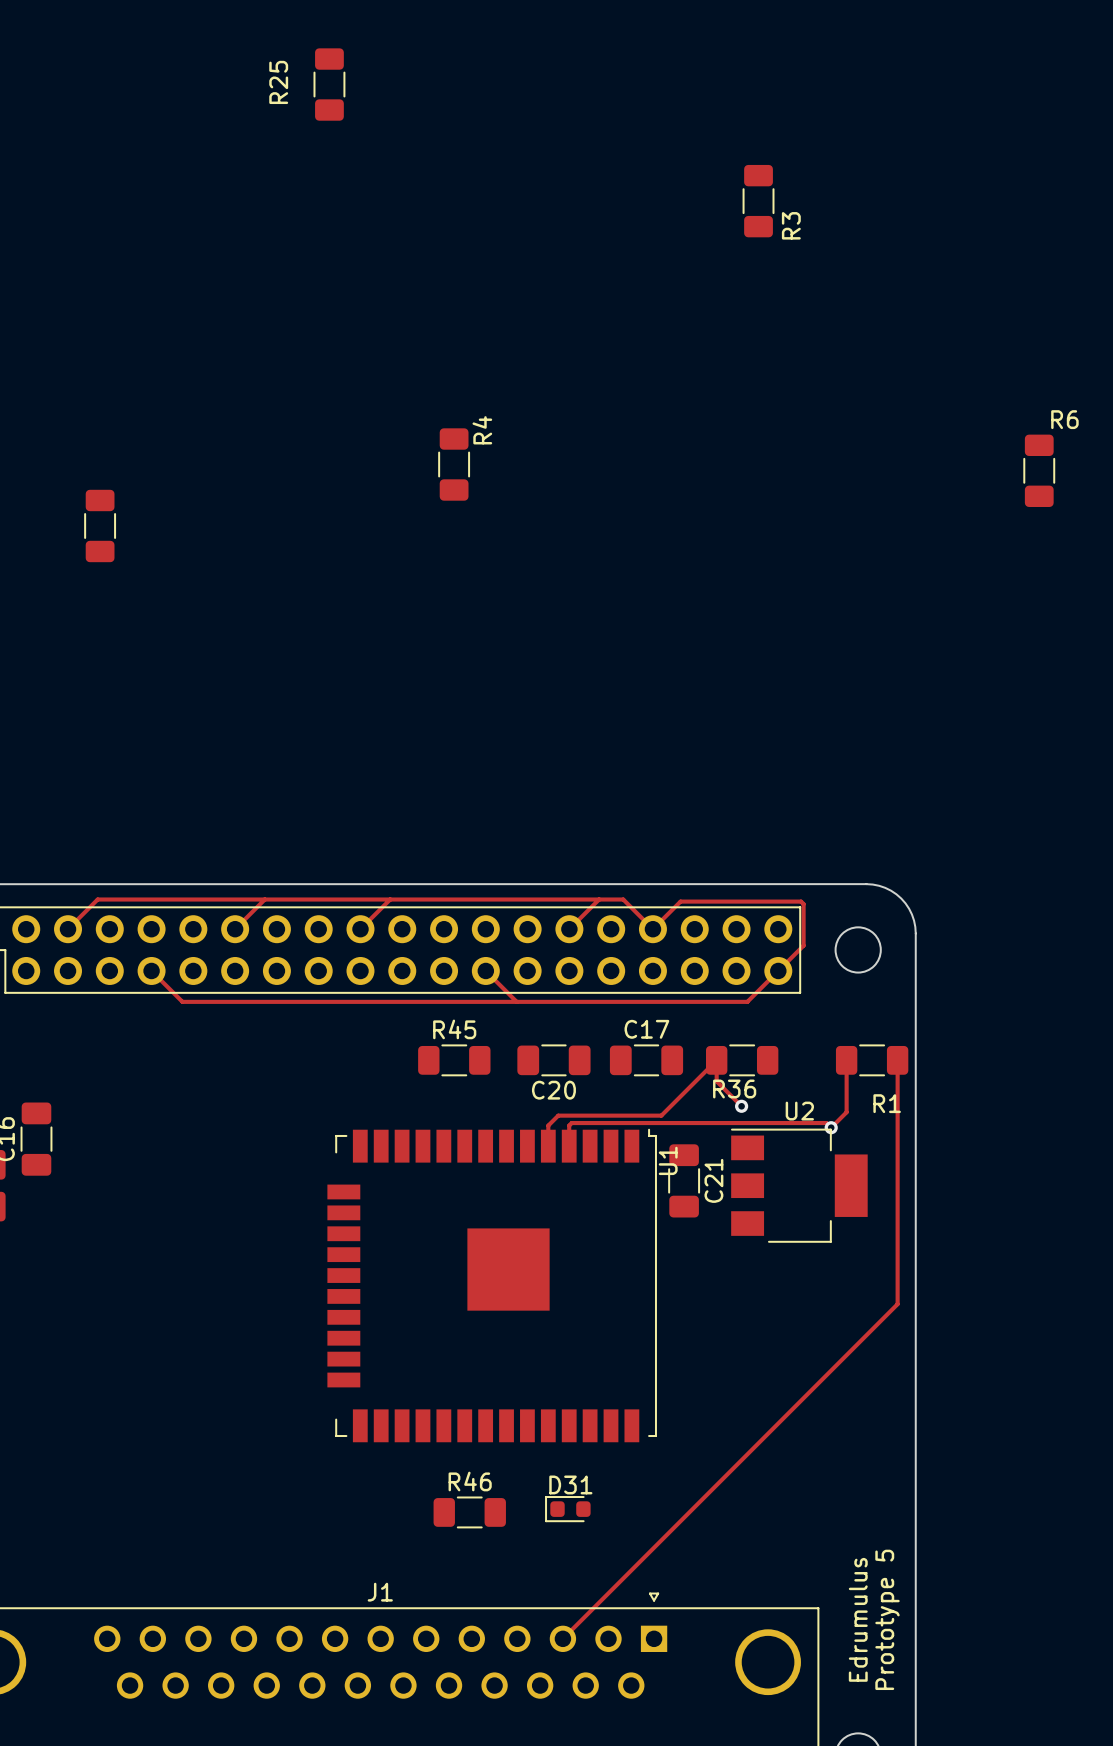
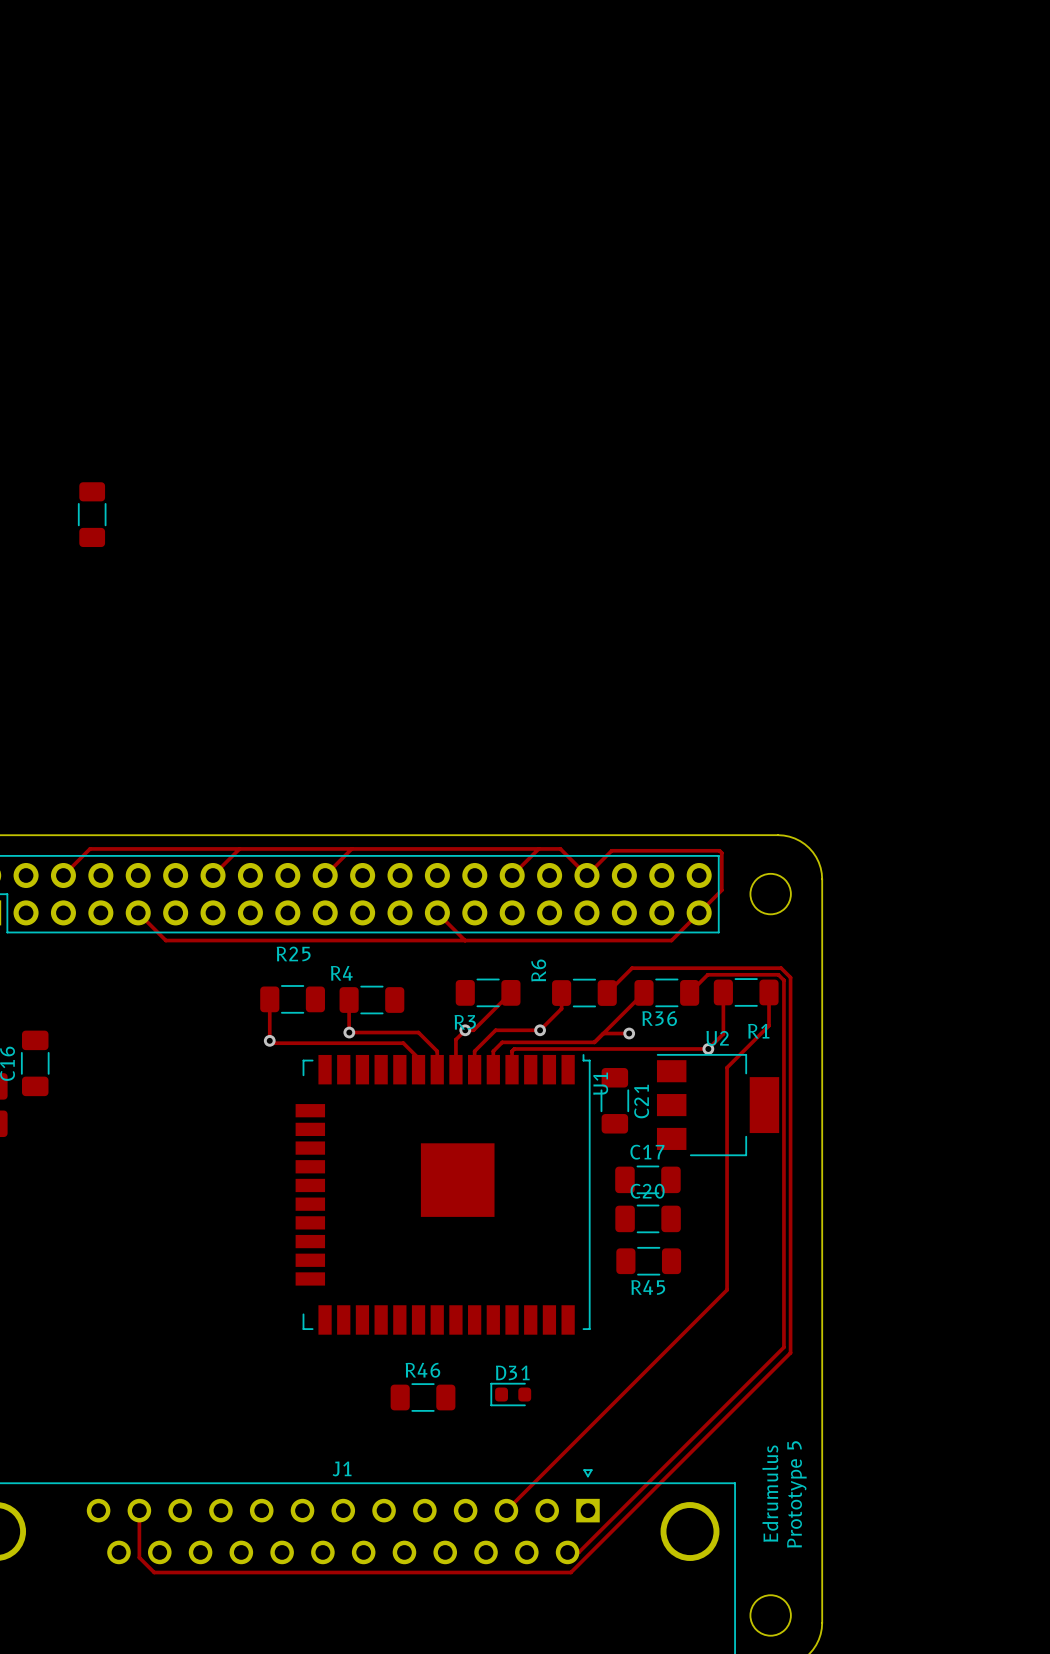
R25 rotation: 0° (329, 84) -> 90° clockwise (292, 999)
R25 position: (329, 84) -> (292, 999)
R3 rotation: 0° (758, 201) -> 90° clockwise (488, 992)
R3 position: (758, 201) -> (488, 992)
R6 name position: R6 (1064, 419) -> R6 (538, 970)
R4 name position: R4 (482, 430) -> R4 (341, 973)
R4 rotation: 0° (454, 464) -> 90° clockwise (371, 1000)
R4 position: (454, 464) -> (371, 1000)
R6 rotation: 0° (1039, 470) -> 90° clockwise (584, 993)
R6 position: (1039, 470) -> (584, 993)
R45 name position: R45 (454, 1029) -> R45 (648, 1287)
R45 position: (454, 1060) -> (648, 1261)
C20 position: (553, 1060) -> (648, 1218)
track: none -> (510, 992) (473, 1030) (465, 1030) (455, 1039) (455, 1069)
track: none -> (561, 993) (561, 1008) (540, 1030) (495, 1030) (474, 1051) (474, 1069)
C17 position: (646, 1060) -> (647, 1179)
track: none -> (607, 993) (632, 968) (781, 968) (790, 977) (790, 1352) (570, 1572) (154, 1572) (139, 1557) (139, 1510)
track: (716, 1060) (716, 1081) (741, 1106) -> none
track: none -> (689, 992) (707, 974) (778, 974) (783, 980) (783, 1347) (578, 1552) (567, 1552)
track: (846, 1060) (846, 1112) (831, 1127) (826, 1123) (788, 1123) -> (723, 992) (723, 1033) (708, 1048)
R1 position: (872, 1060) -> (746, 992)
track: (897, 1060) (897, 1304) (809, 1392) -> (769, 992) (769, 1025) (727, 1067) (727, 1289)
track: none -> (269, 999) (269, 1040) (272, 1043) (403, 1043) (418, 1058) (418, 1069)
track: none -> (349, 1000) (349, 1032) (418, 1032) (437, 1051) (437, 1069)
C20 name position: C20 (553, 1090) -> C20 (647, 1191)
via: none -> (465, 1030)
via: none -> (540, 1030)
via: none -> (349, 1032)
track: none -> (603, 1033) (629, 1033)
via: none -> (629, 1033)
via: (741, 1106) -> none
via: none -> (269, 1040)
via: none -> (708, 1048)
via: (831, 1127) -> none

